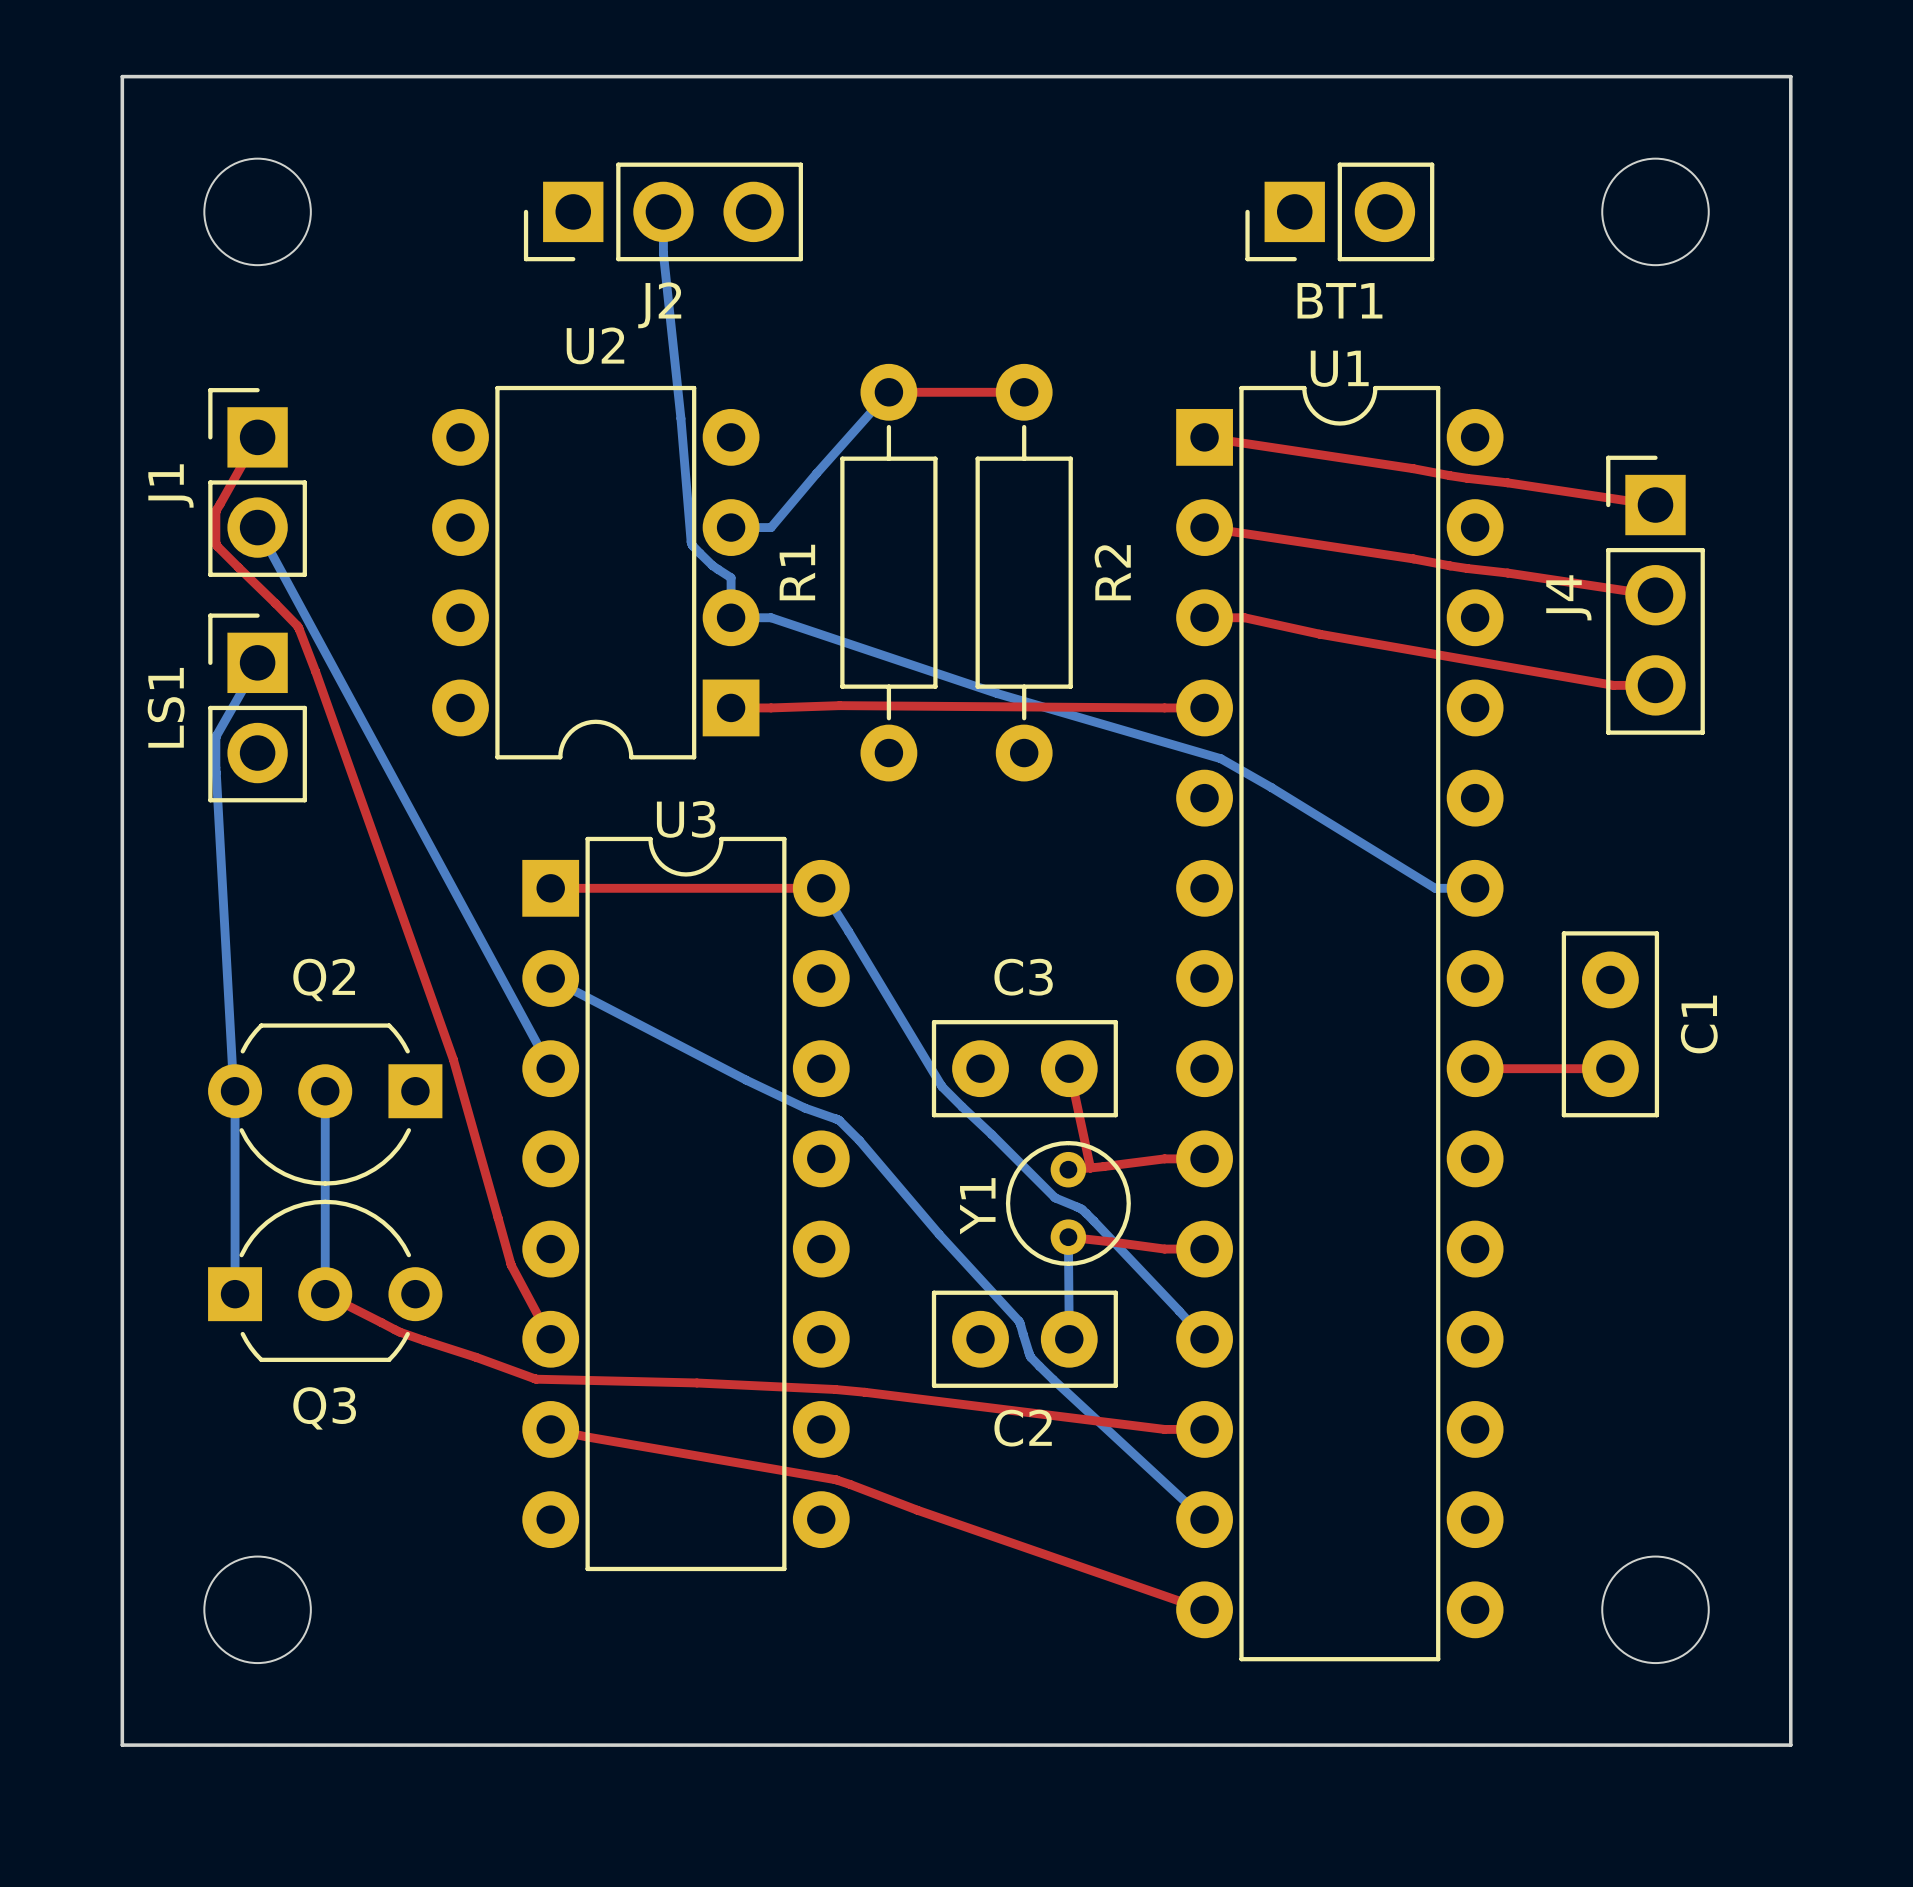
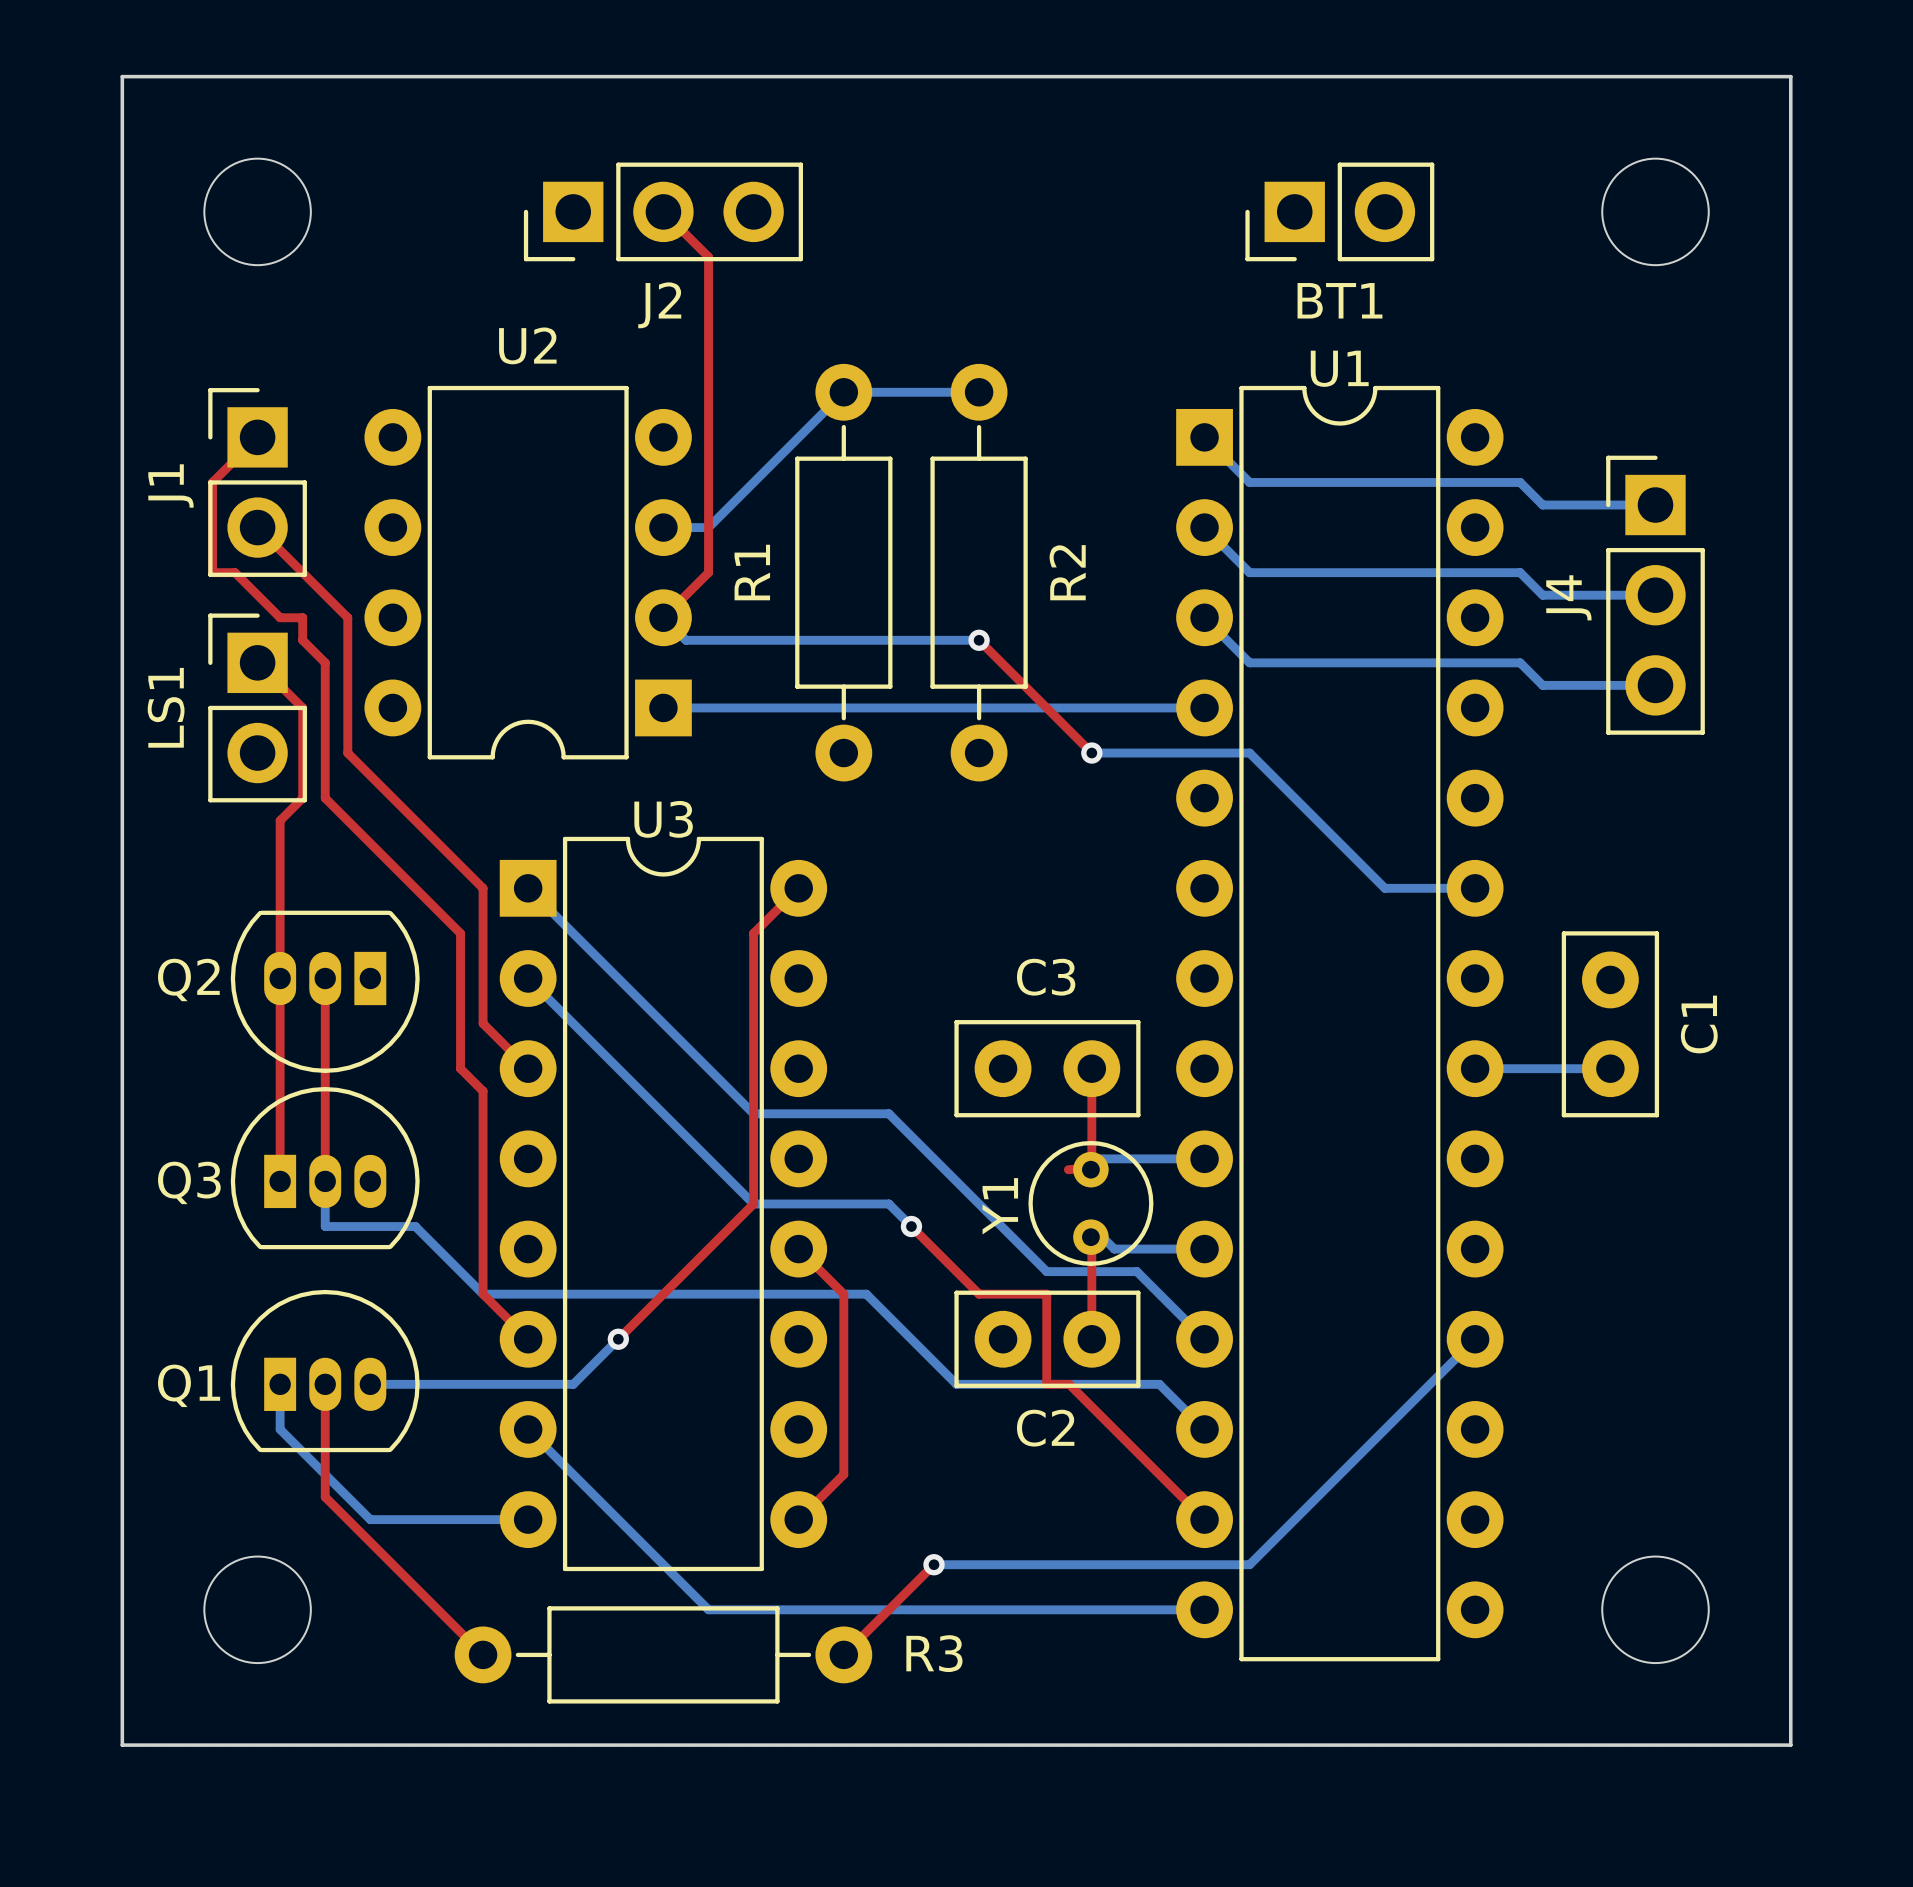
top track: none -> (663, 211) (708, 257) (708, 572) (663, 617)
bottom track: (663, 211) (663, 253) (692, 545) -> none
top track: (888, 392) (1024, 392) -> none
bottom track: (888, 392) (771, 527) (731, 527) -> none
bottom track: none -> (979, 392) (843, 392) (708, 527) (663, 527)
top track: (257, 437) (216, 511) (216, 543) (299, 629) (453, 1059) (510, 1264) (550, 1339) -> (257, 437) (212, 482) (212, 572) (235, 572) (280, 617) (302, 617) (302, 640) (325, 662) (325, 798) (460, 933) (460, 1068) (483, 1091) (483, 1294) (528, 1339)
top track: (1204, 437) (1467, 478) (1655, 505) -> none
bottom track: none -> (1204, 437) (1249, 482) (1520, 482) (1542, 505) (1655, 505)
top track: none -> (257, 527) (347, 617) (347, 753) (483, 888) (483, 1023) (528, 1068)
bottom track: (257, 527) (550, 1068) -> none
top track: (1204, 527) (1467, 568) (1655, 595) -> none
bottom track: none -> (1204, 527) (1249, 572) (1520, 572) (1542, 595) (1655, 595)
bottom track: (692, 545) (712, 565) (731, 577) (731, 617) (771, 617) (997, 693) (1220, 758) (1435, 888) -> (1091, 753) (1249, 753) (1384, 888) (1435, 888)
U2 position: (595, 572) -> (528, 572)
R1 position: (888, 572) -> (843, 572)
R2 position: (1024, 572) -> (979, 572)
bottom track: none -> (663, 617) (685, 640) (979, 640)
top track: (1204, 617) (1244, 617) (1319, 634) (1613, 685) (1655, 685) -> none
bottom track: none -> (1204, 617) (1249, 662) (1520, 662) (1542, 685) (1655, 685)
top track: none -> (979, 640) (1091, 753)
via: none -> (979, 640)
top track: none -> (257, 662) (302, 707) (302, 798) (280, 820) (280, 1181)
bottom track: (257, 662) (215, 738) (215, 767) (235, 1114) -> none
bottom track: none -> (663, 707) (1204, 707)
top track: (731, 707) (839, 705) (1204, 707) -> none
via: none -> (1091, 753)
top track: (550, 888) (821, 888) -> none
top track: none -> (798, 888) (753, 933) (753, 1203) (618, 1339)
bottom track: (821, 888) (942, 1087) (1054, 1197) (1081, 1208) (1086, 1213) (1204, 1339) -> (528, 888) (753, 1113) (888, 1113) (1046, 1271) (1136, 1271) (1204, 1339)
top track: none -> (325, 978) (325, 1181)
bottom track: none -> (528, 978) (753, 1203) (888, 1203) (911, 1226)
bottom track: (550, 978) (746, 1080) (805, 1108) (836, 1119) -> none
Q2 name position: Q2 (324, 979) -> Q2 (188, 979)
Q2 footprint: [208, 1023, 443, 1186] -> [230, 910, 420, 1073]
C3 position: (1024, 1068) -> (1047, 1068)
top track: (1069, 1068) (1090, 1167) (1164, 1158) (1204, 1158) -> none
top track: none -> (1091, 1068) (1090, 1169)
top track: (1475, 1068) (1610, 1068) -> none
bottom track: none -> (1475, 1068) (1610, 1068)
bottom track: (235, 1091) (235, 1294) -> none
bottom track: (325, 1091) (325, 1181) -> none
bottom track: (836, 1119) (859, 1140) (939, 1234) (1018, 1321) (1030, 1357) -> none
bottom track: none -> (1204, 1158) (1091, 1158) (1090, 1169)
Q3 footprint: [208, 1199, 443, 1362] -> [230, 1086, 420, 1250]
U3 position: (685, 1203) -> (663, 1203)
Y1 position: (1068, 1203) -> (1090, 1203)
bottom track: (325, 1226) (325, 1294) -> (325, 1226) (415, 1226) (483, 1294) (866, 1294) (956, 1384) (1159, 1384) (1204, 1429)
top track: none -> (911, 1226) (979, 1294) (1046, 1294) (1046, 1384) (1069, 1384) (1204, 1519)
via: none -> (911, 1226)
top track: (1068, 1237) (1164, 1249) (1204, 1249) -> none
bottom track: (1068, 1237) (1069, 1339) -> none
top track: none -> (1090, 1237) (1091, 1226) (1091, 1339)
bottom track: none -> (1090, 1237) (1091, 1226) (1114, 1249) (1204, 1249)
top track: none -> (798, 1249) (843, 1294) (843, 1474) (798, 1519)
top track: (325, 1294) (399, 1332) (536, 1379) (696, 1382) (835, 1389) (1164, 1429) (1204, 1429) -> none
bottom track: none -> (618, 1339) (573, 1384) (370, 1384)
via: none -> (618, 1339)
C2 position: (1024, 1339) -> (1047, 1339)
bottom track: none -> (1475, 1339) (1249, 1564) (934, 1564)
bottom track: (1031, 1357) (1204, 1519) -> none
Q1: none -> (325, 1371)
bottom track: none -> (280, 1384) (280, 1429) (370, 1519) (528, 1519)
top track: none -> (325, 1384) (325, 1497) (483, 1654)
Q3 name position: Q3 (324, 1408) -> Q3 (189, 1182)
bottom track: none -> (528, 1429) (708, 1609) (1204, 1609)
top track: (550, 1429) (836, 1479) (917, 1510) (1204, 1609) -> none
top track: none -> (934, 1564) (843, 1654)
via: none -> (934, 1564)
R3: none -> (663, 1654)

